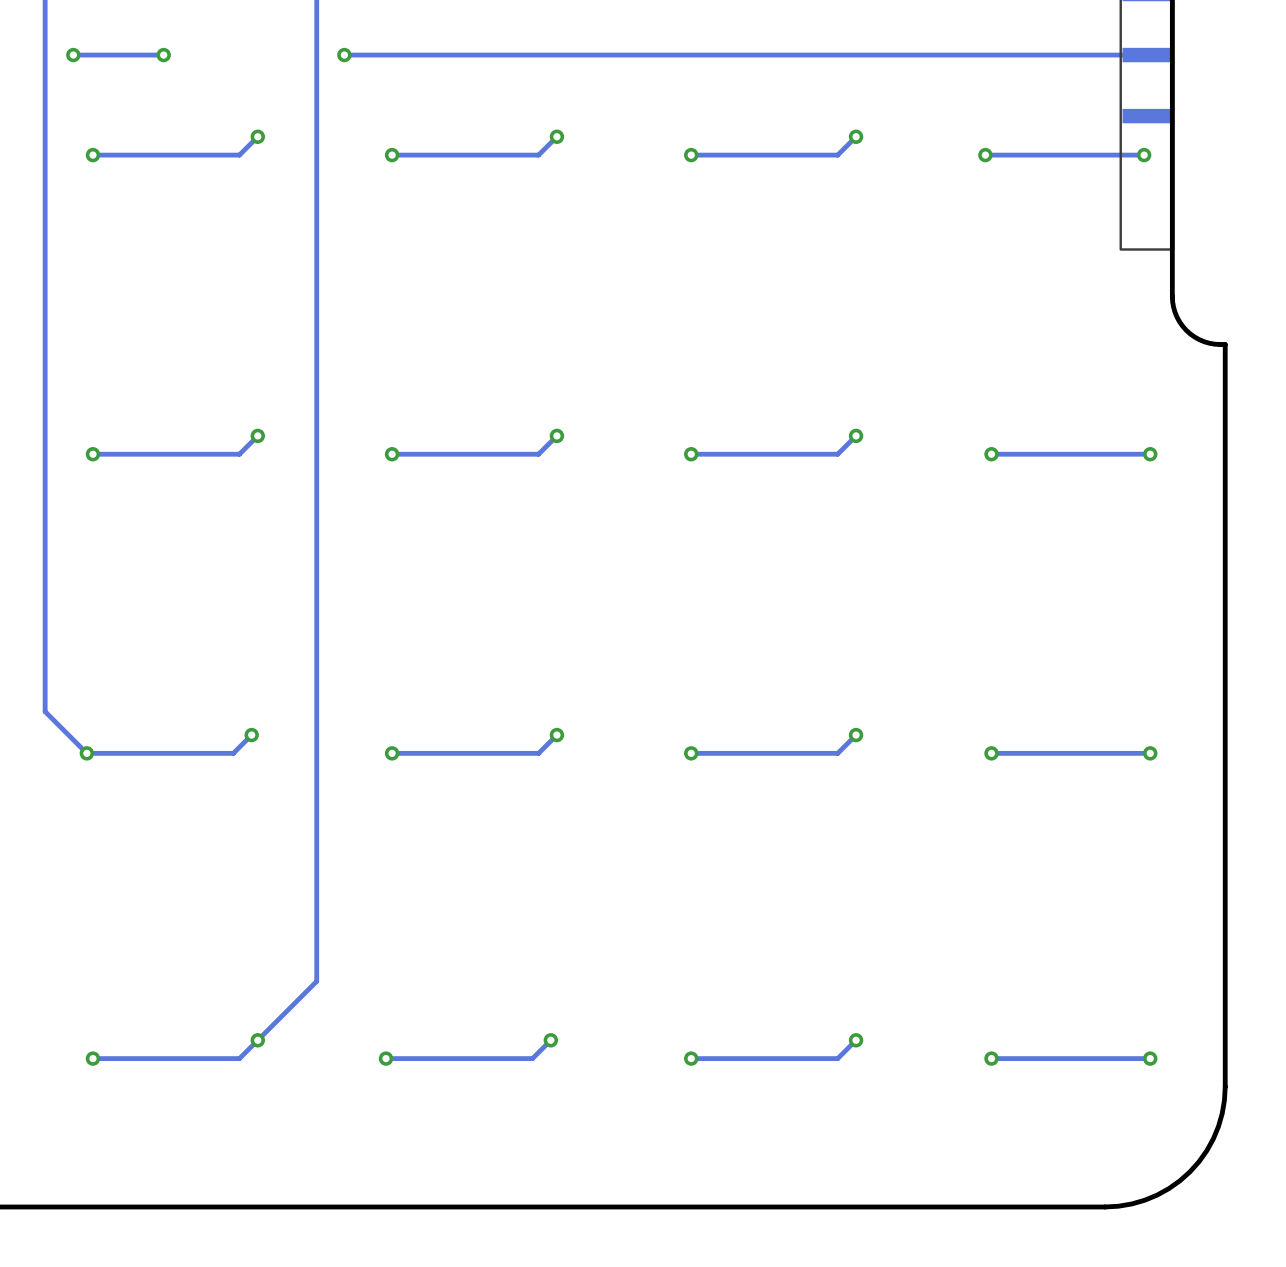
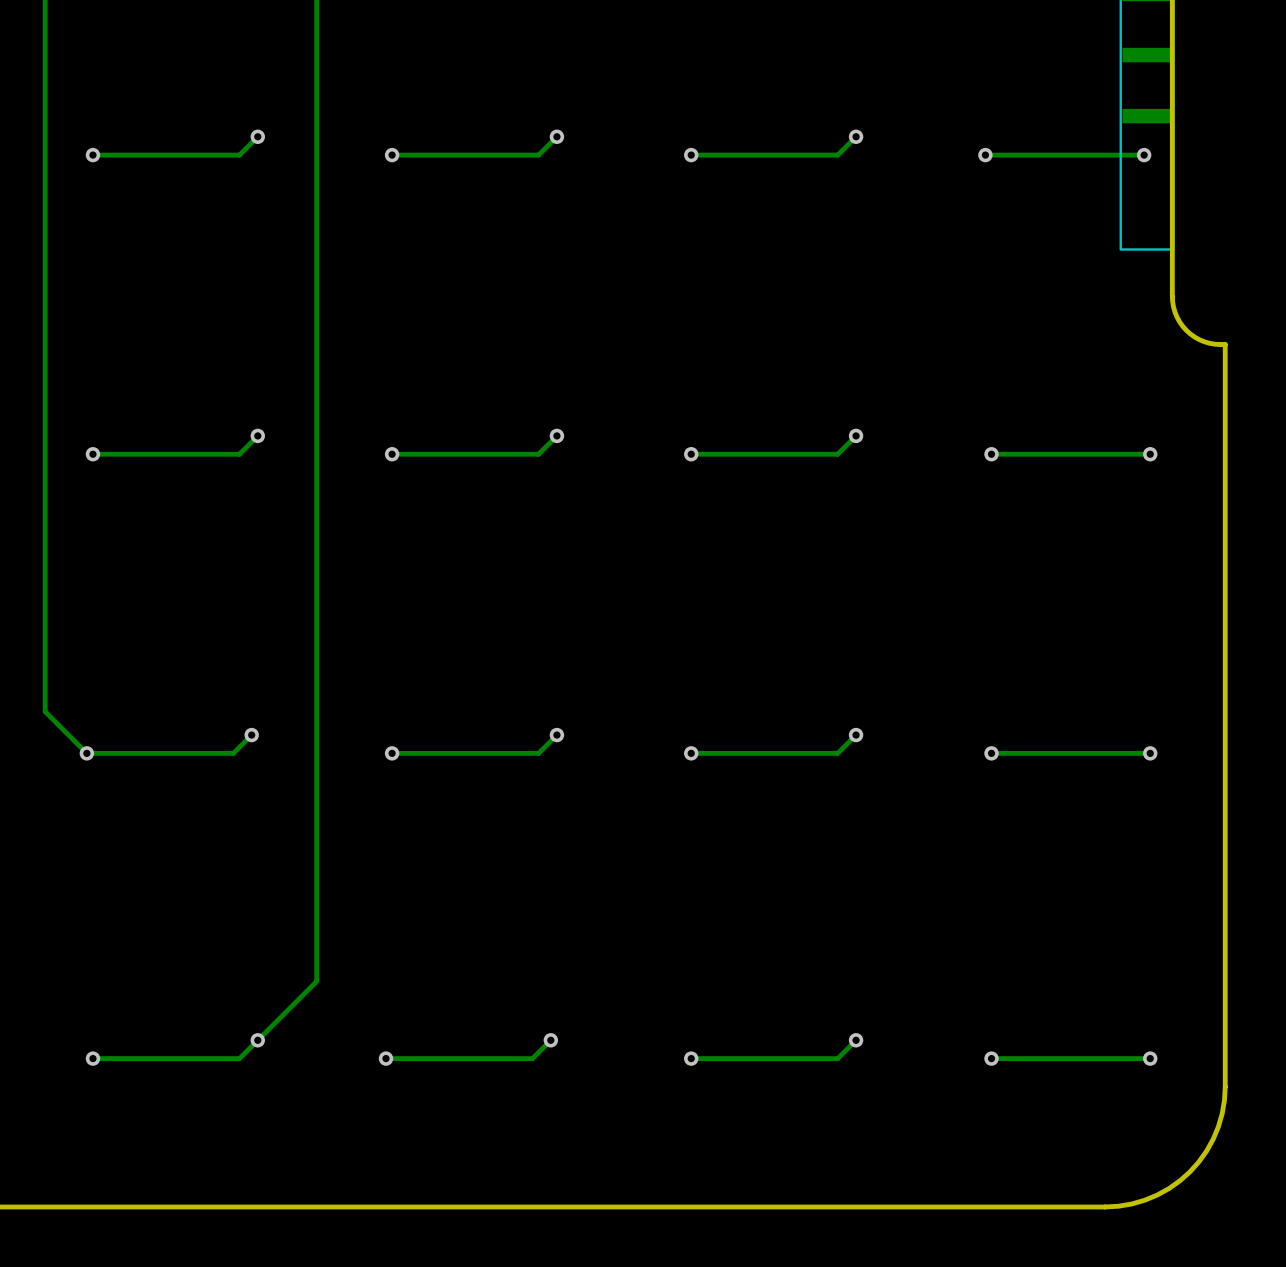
via: (73, 55) -> none
track: (163, 55) (73, 55) -> none
via: (163, 55) -> none
via: (344, 55) -> none
track: (1146, 55) (344, 55) -> none

